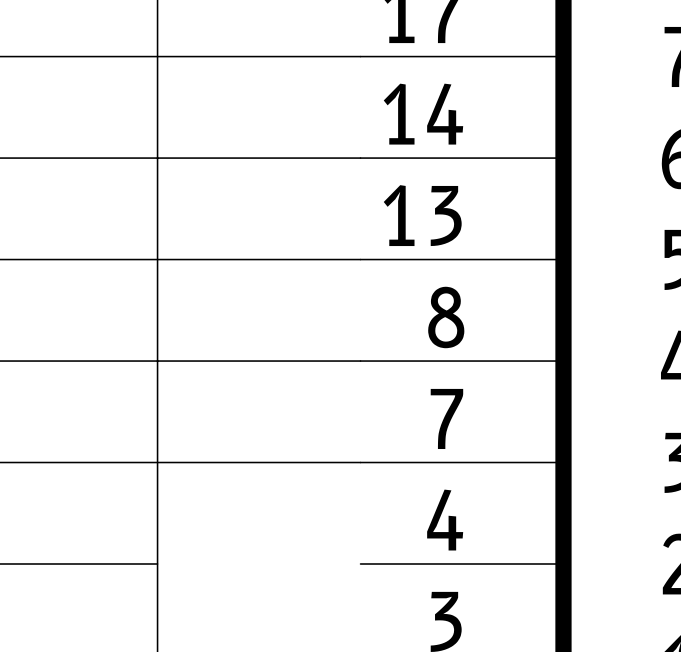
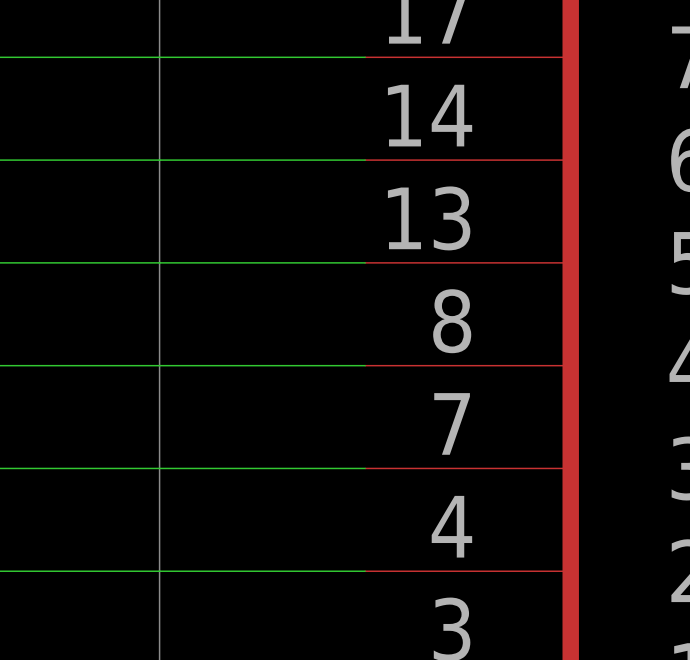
wire: none -> (159, 571) (365, 571)

